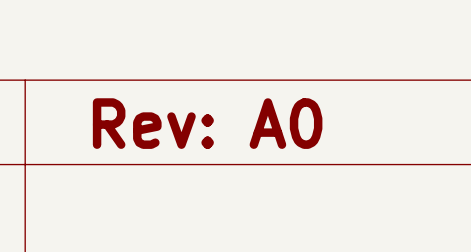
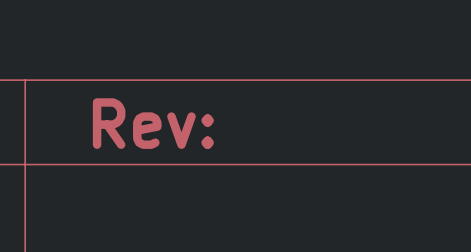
title block: Rev: A0 (207, 123) -> Rev: (153, 123)

